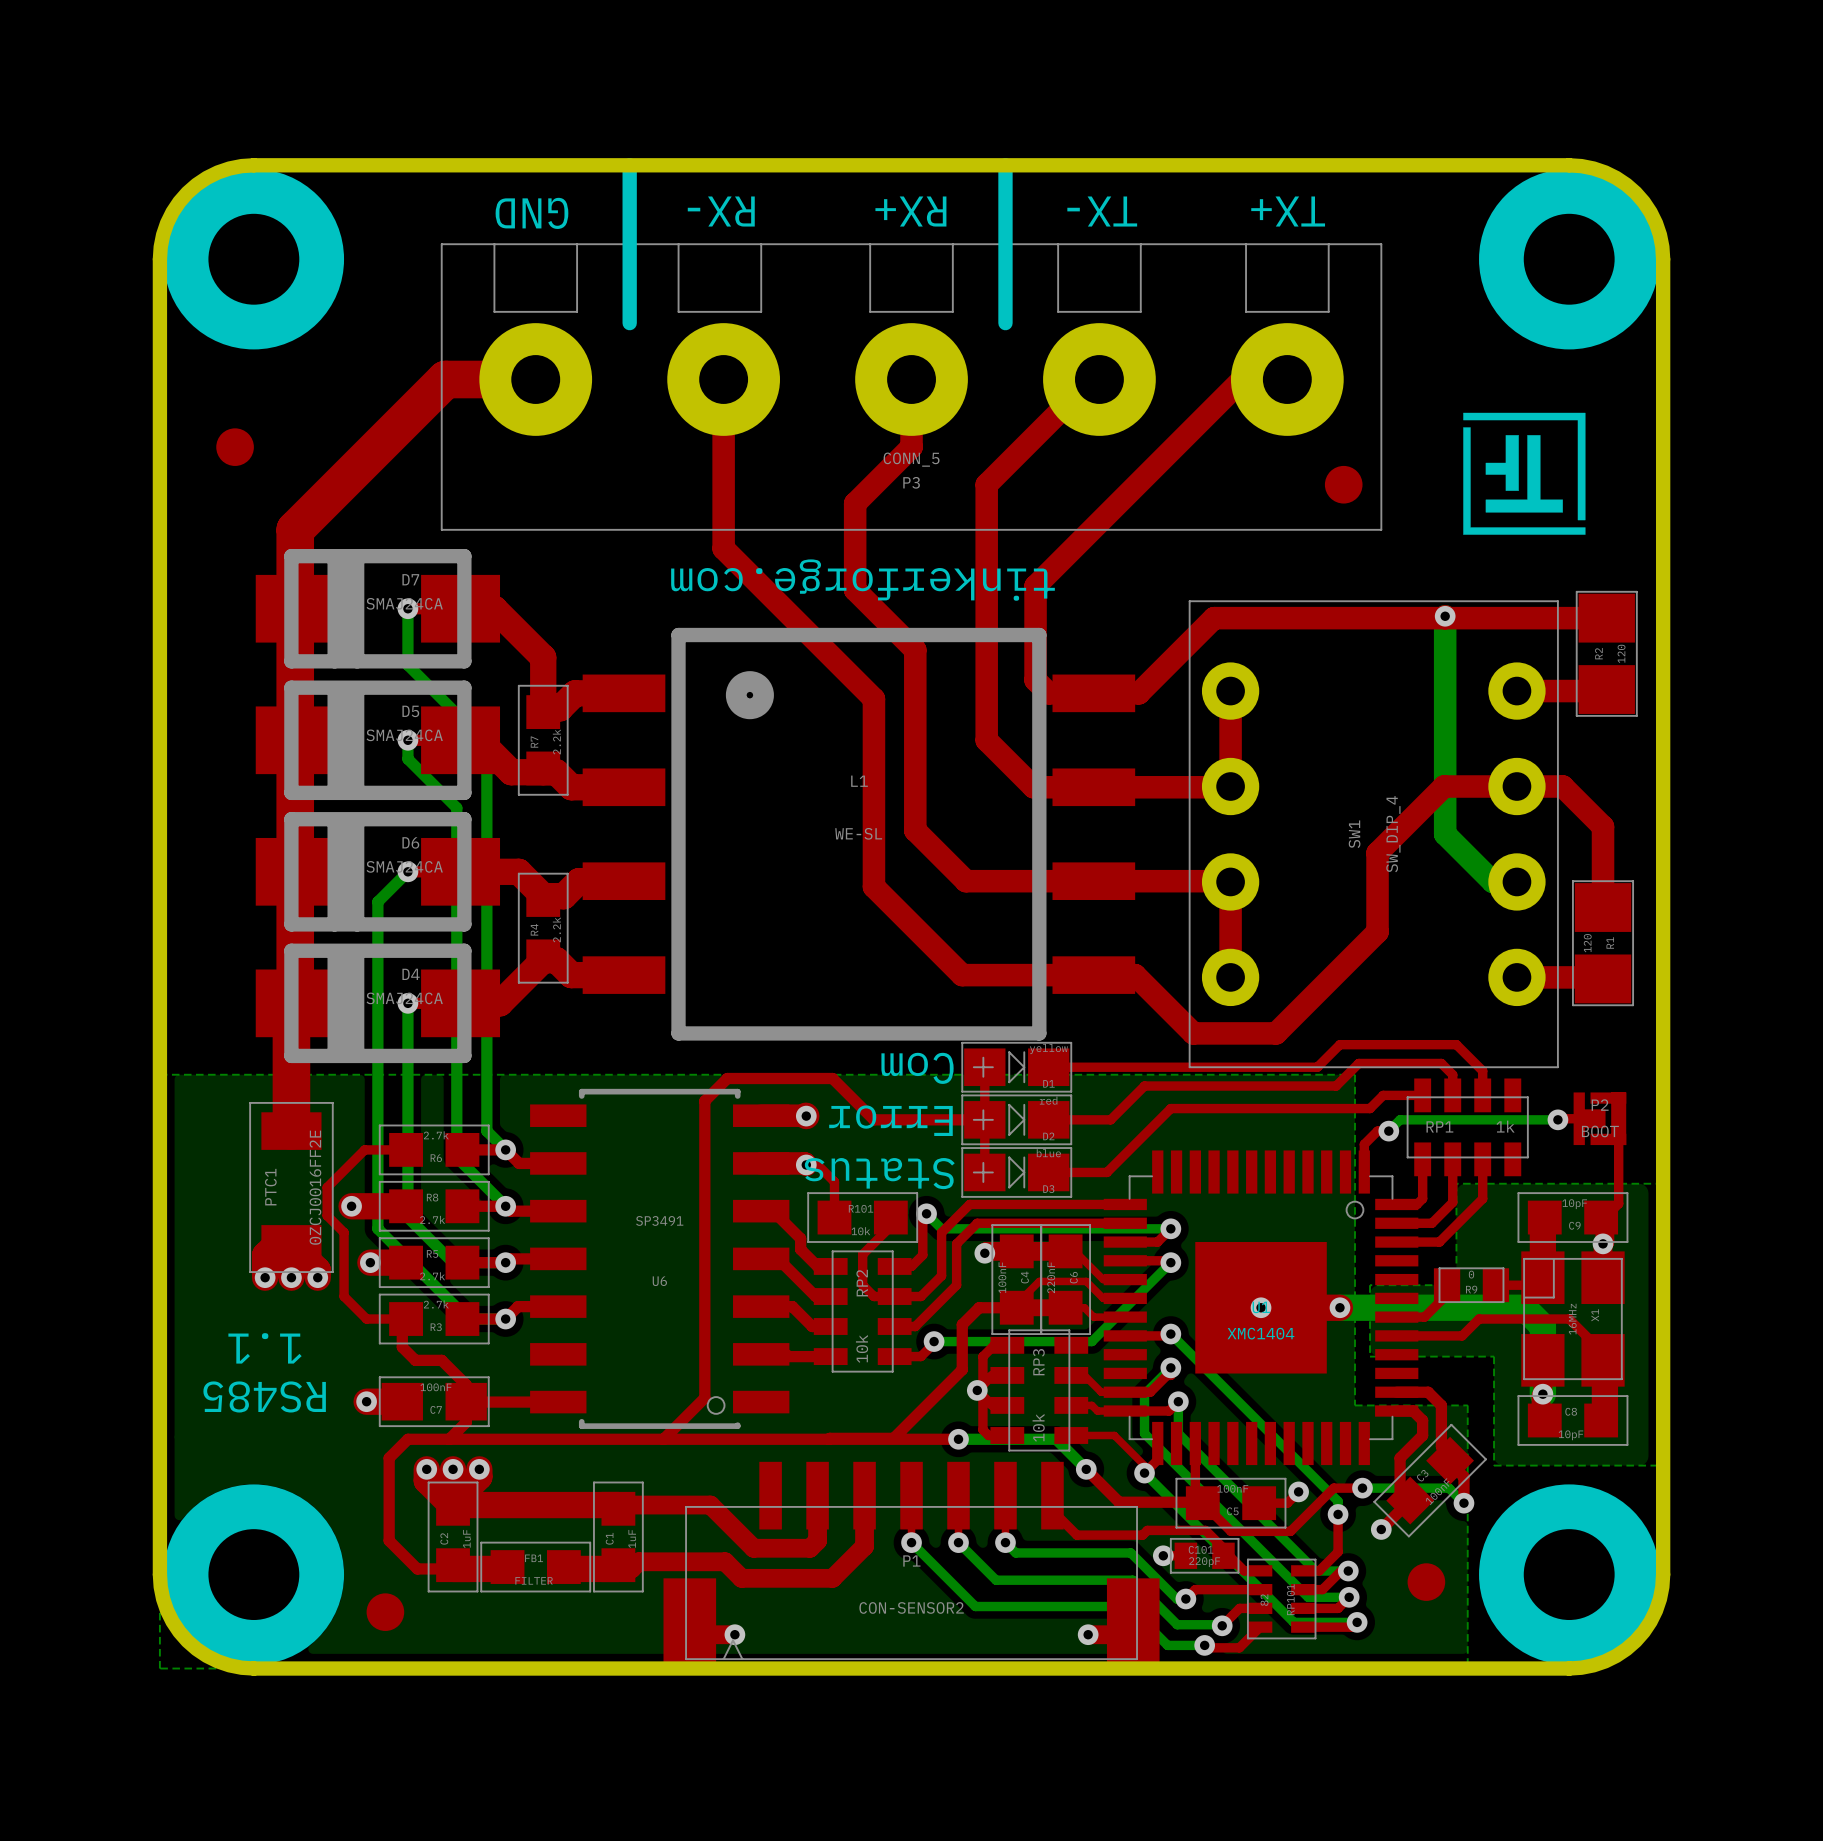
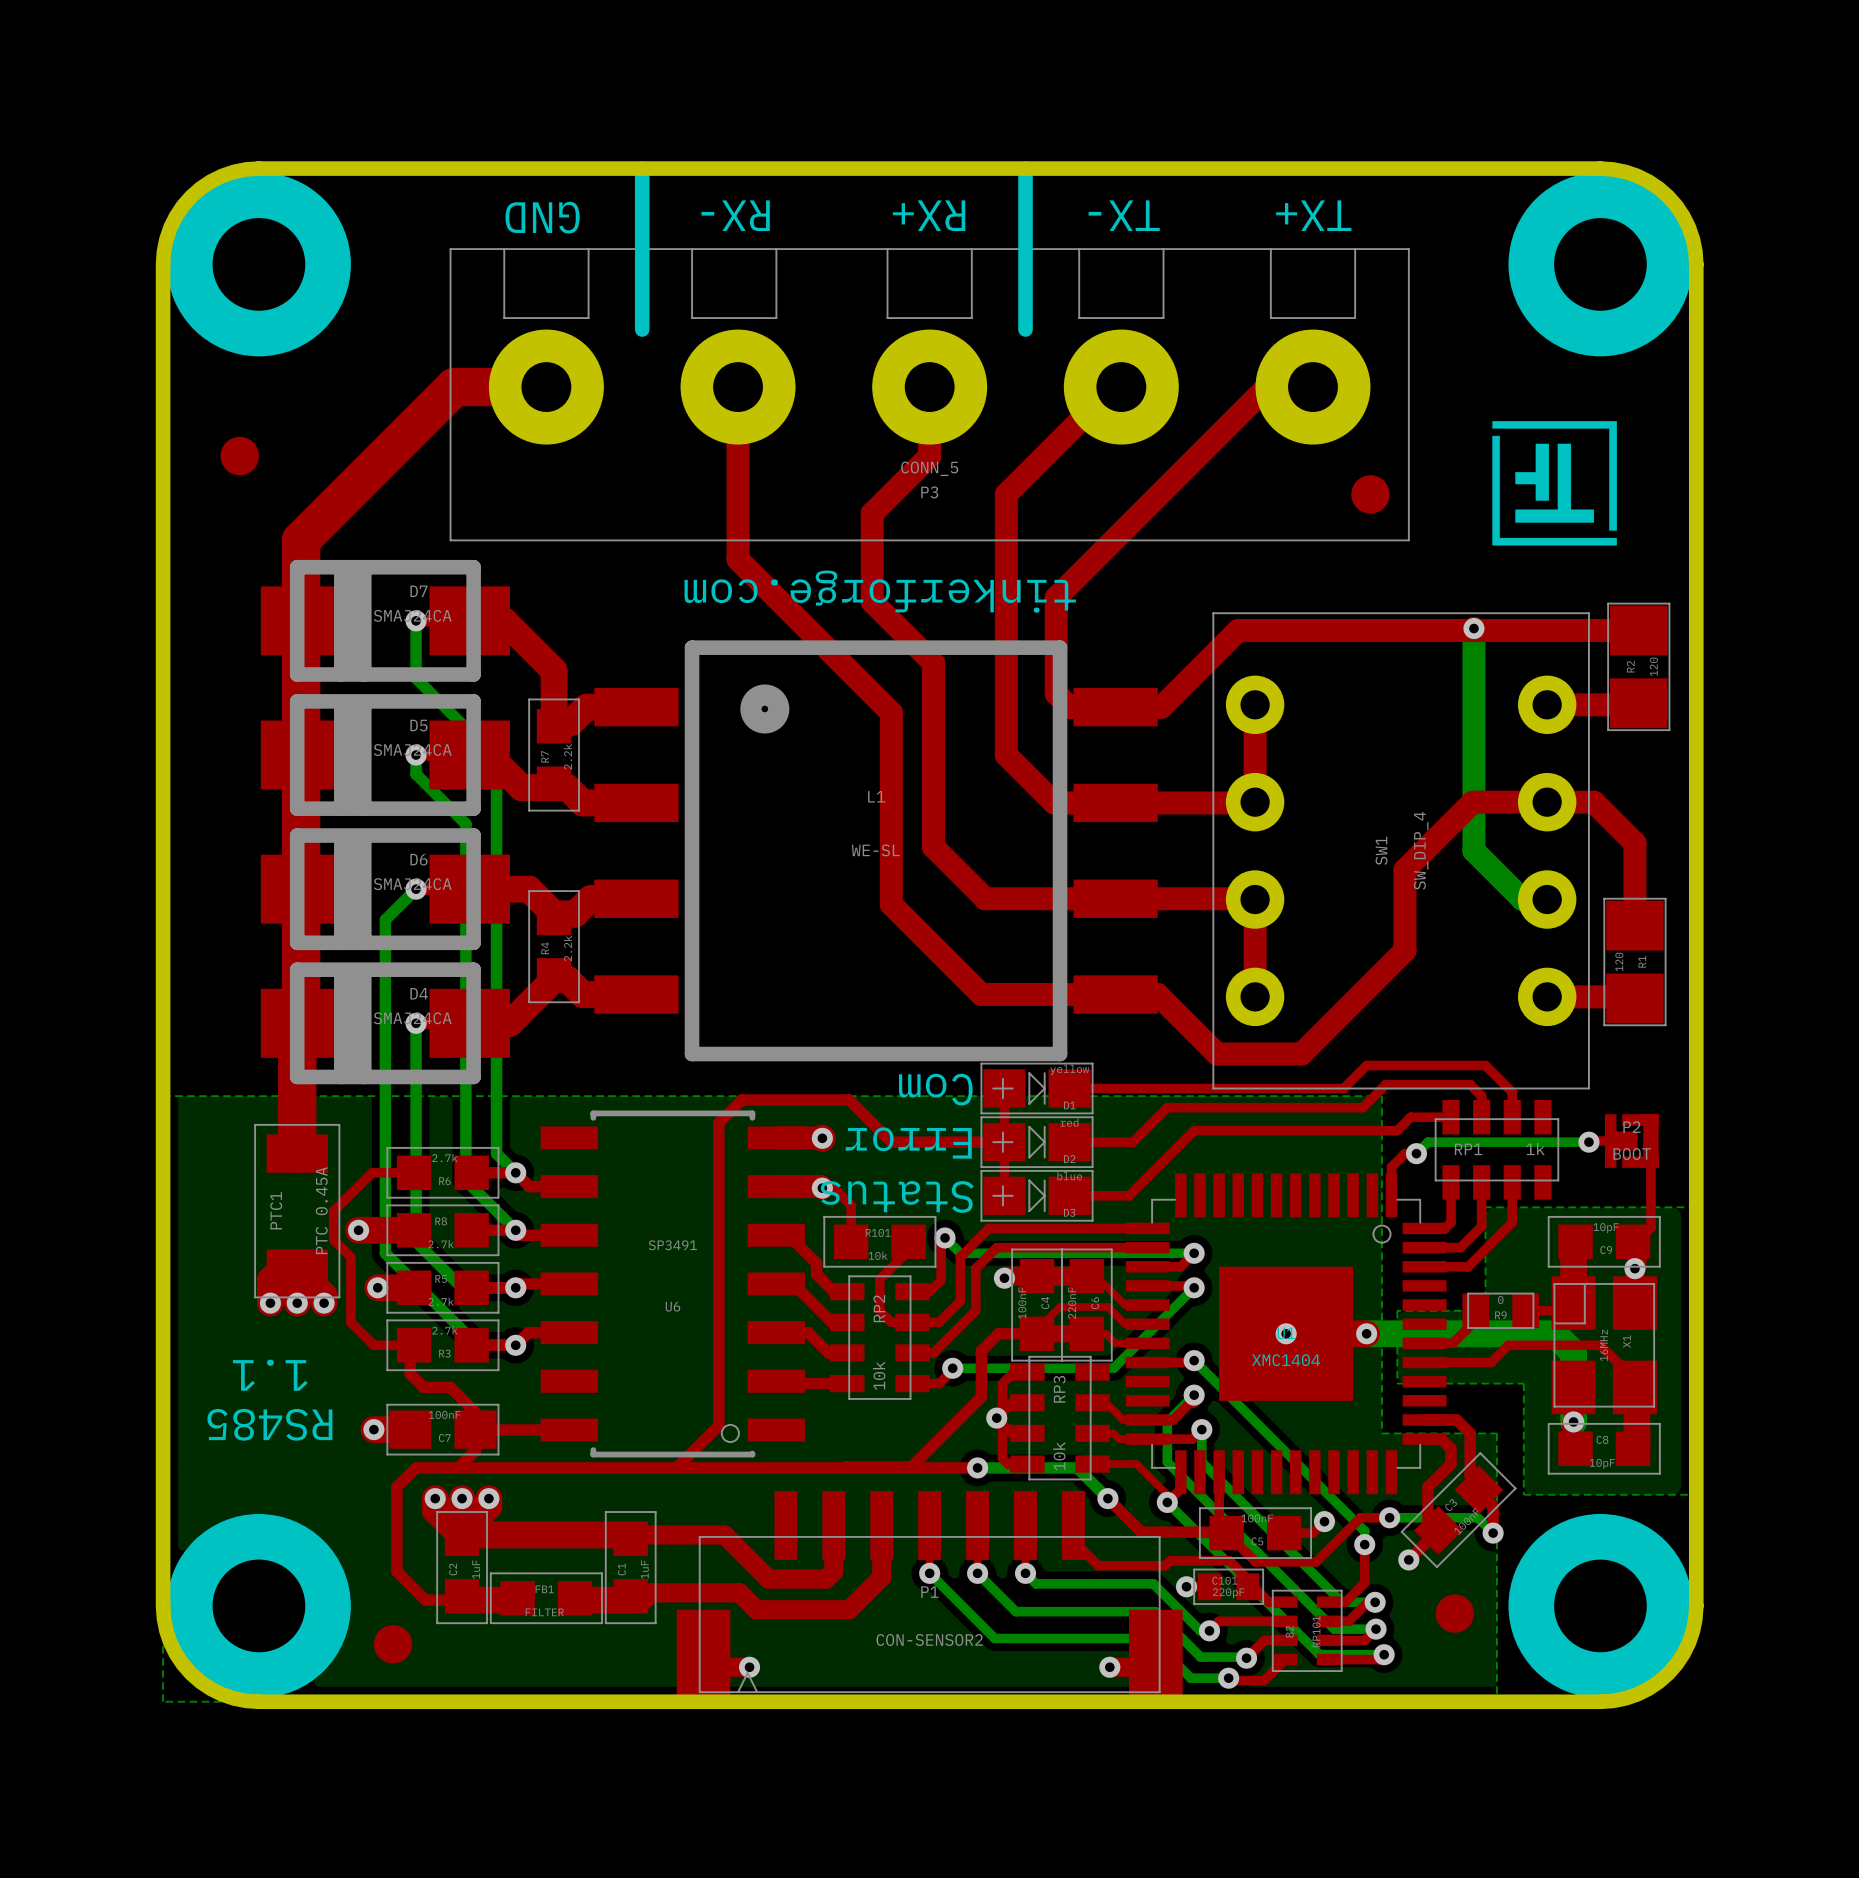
PTC1 value: 0ZCJ0016FF2E (315, 1187) -> PTC 0.45A (321, 1210)

